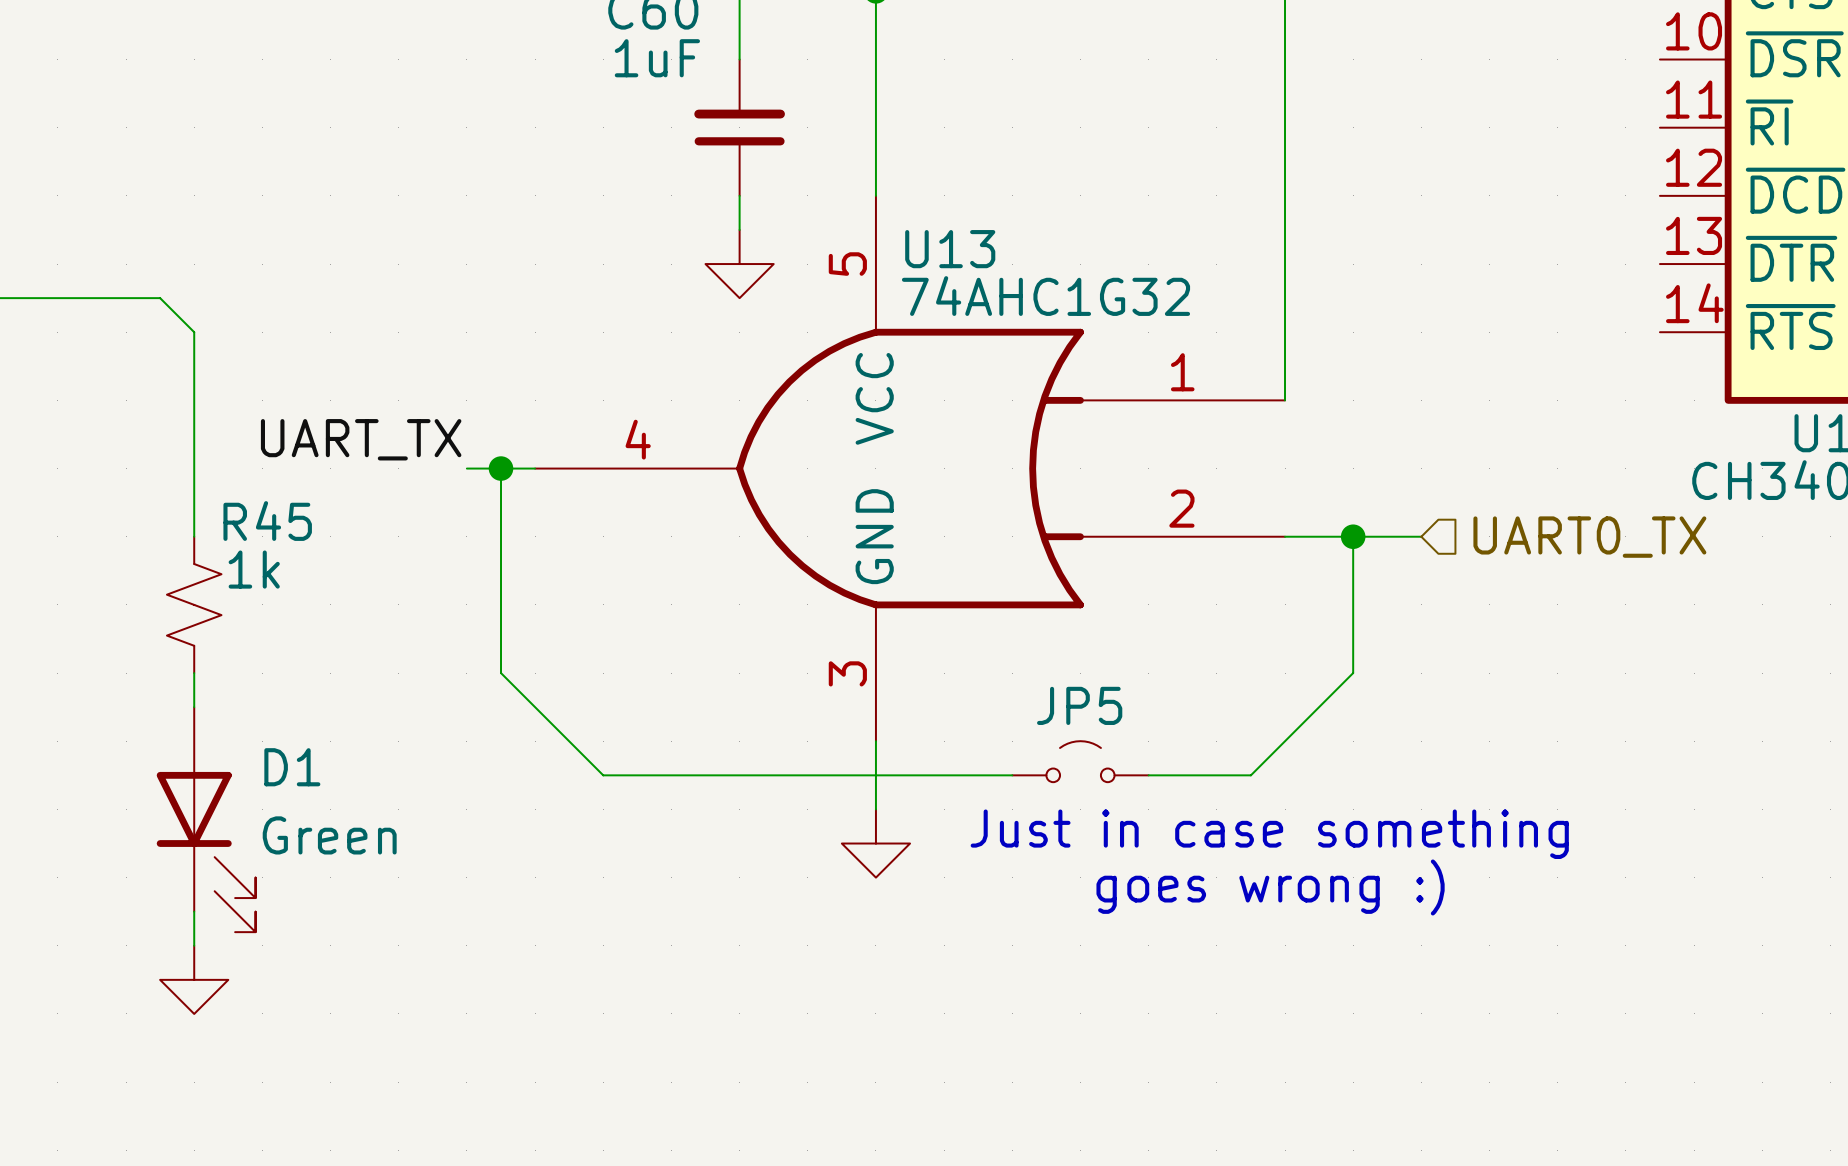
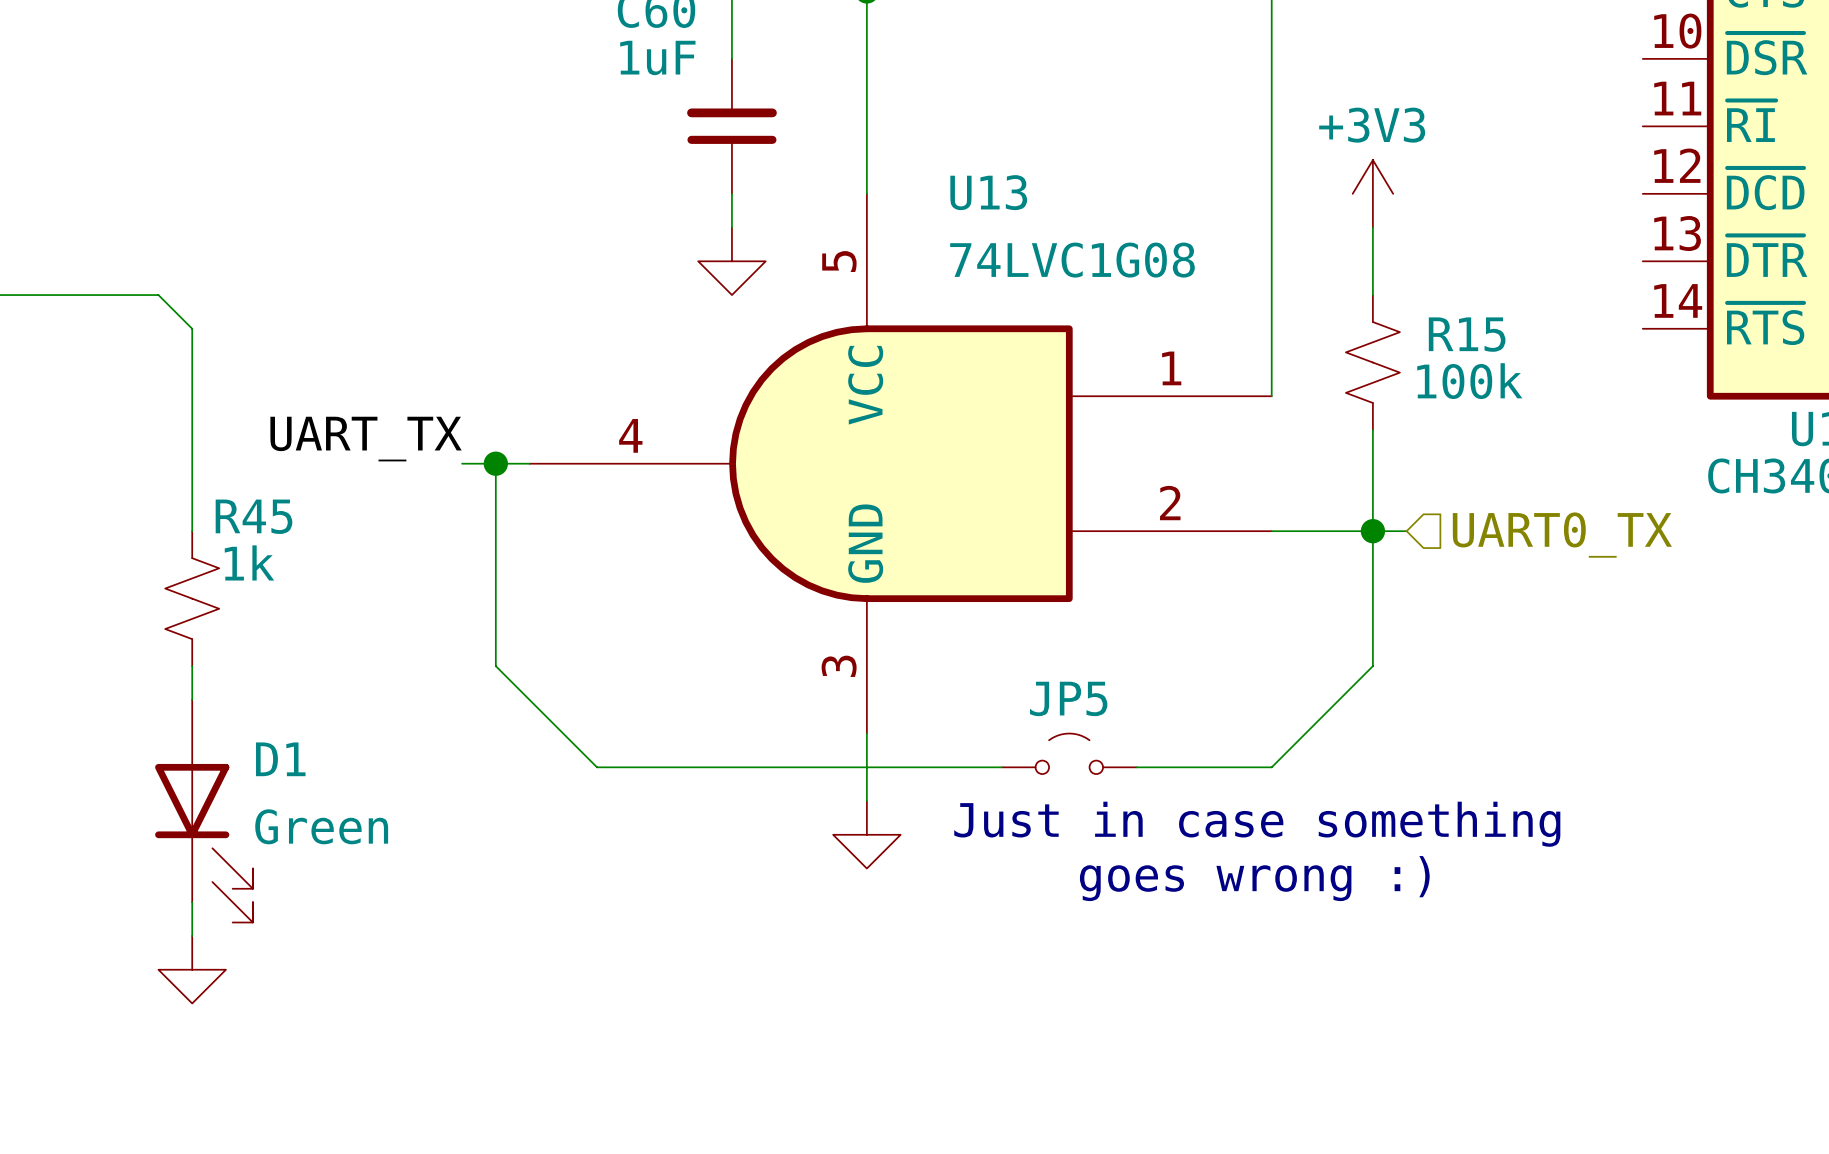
U13 symbol: [535, 195, 1286, 742] -> [529, 193, 1272, 734]
power symbol: none -> +3V3 (1372, 193)
wire: none -> (1372, 227) (1372, 295)
U13 name position: U13 (950, 249) -> U13 (988, 192)
U13 value: 74AHC1G32 (1046, 296) -> 74LVC1G08 (1072, 260)
R15: none -> 100k (1372, 362)
wire: (1353, 536) (1353, 673) (1250, 775) -> (1372, 429) (1372, 666) (1271, 767) (1237, 767)
junction position: (1353, 536) -> (1372, 531)

